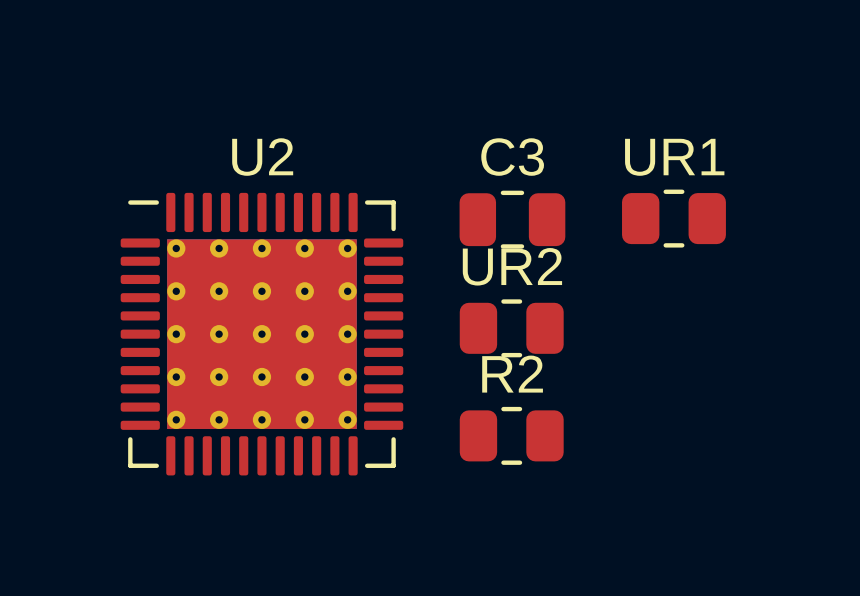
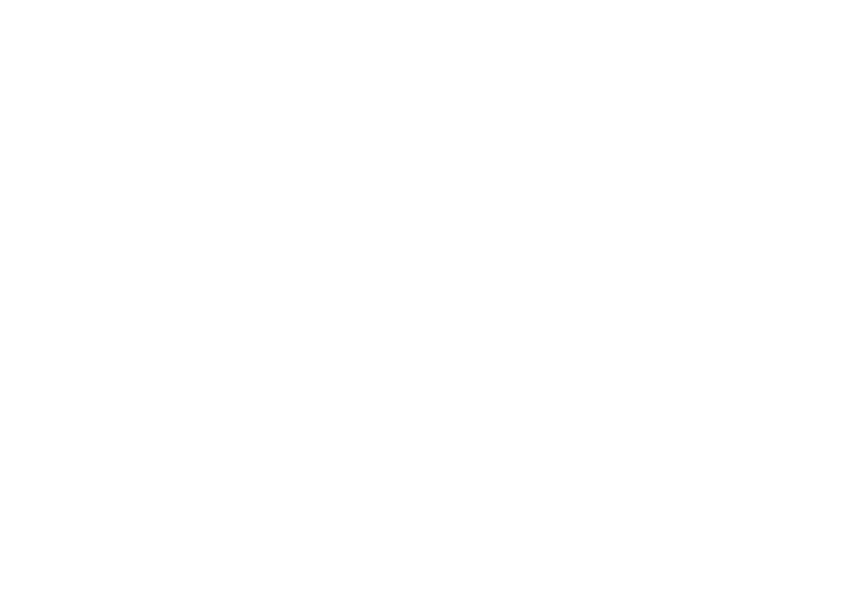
UR1: (673, 218) -> none
C3: (512, 219) -> none
UR2: (511, 328) -> none
U2: (261, 334) -> none
R2: (511, 435) -> none

